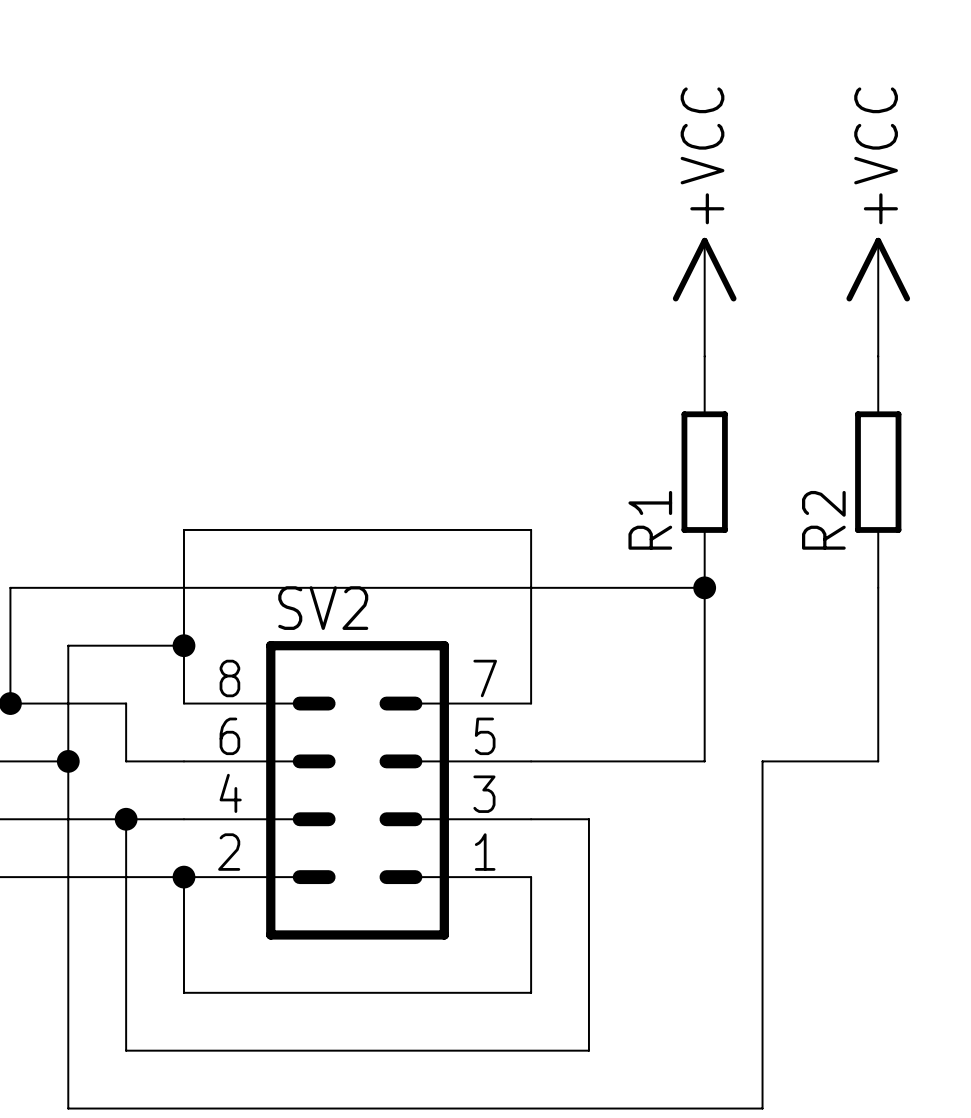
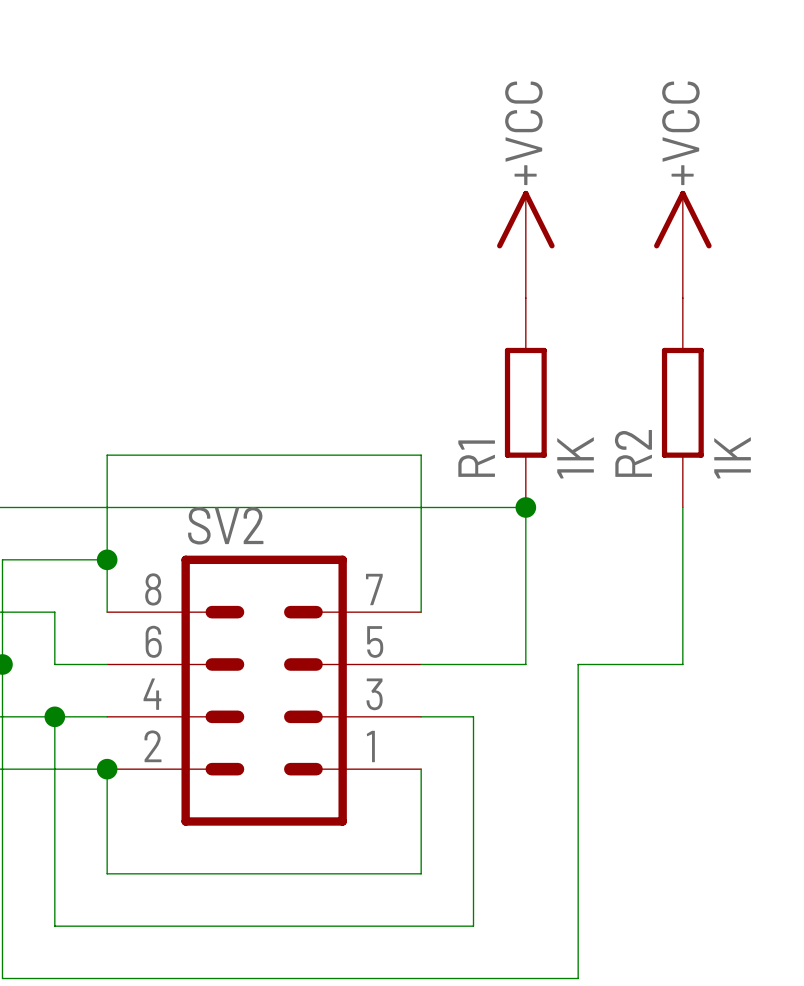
power symbol: none -> +VCC (525, 244)
power symbol: +VCC (704, 297) -> none
power symbol: none -> +VCC (682, 244)
power symbol: +VCC (878, 297) -> none
R1 position: (704, 472) -> (525, 402)
R2 position: (878, 472) -> (682, 402)
R1 value: none -> 1K (575, 457)
R2 value: none -> 1K (732, 457)
wire: (646, 587) (704, 587) (704, 761) (646, 761) -> (525, 507) (525, 664)
junction position: (704, 587) -> (525, 507)
wire: (878, 587) (878, 761) (820, 761) -> (682, 507) (682, 664)
wire: (762, 761) (762, 1108) (704, 1108) -> (630, 664) (578, 664) (578, 978)

